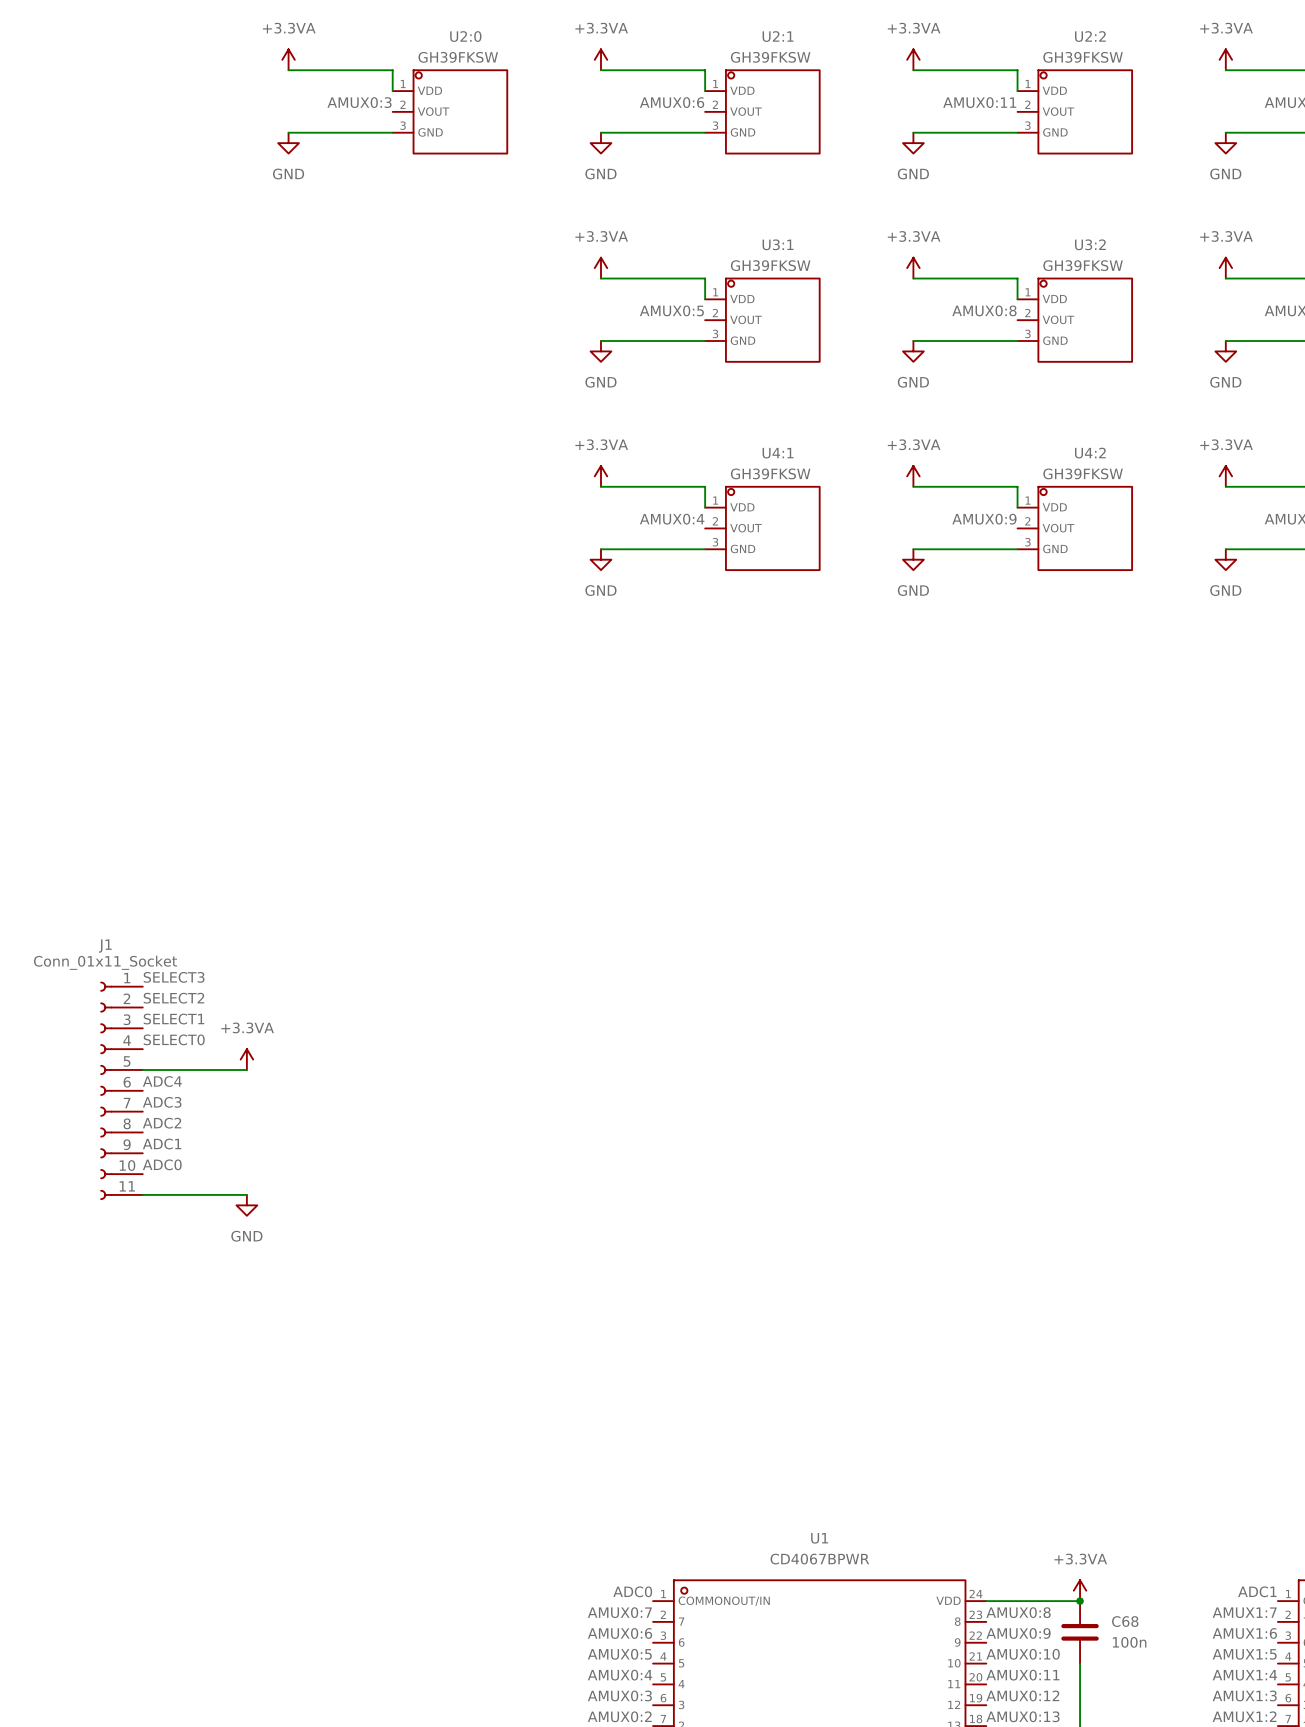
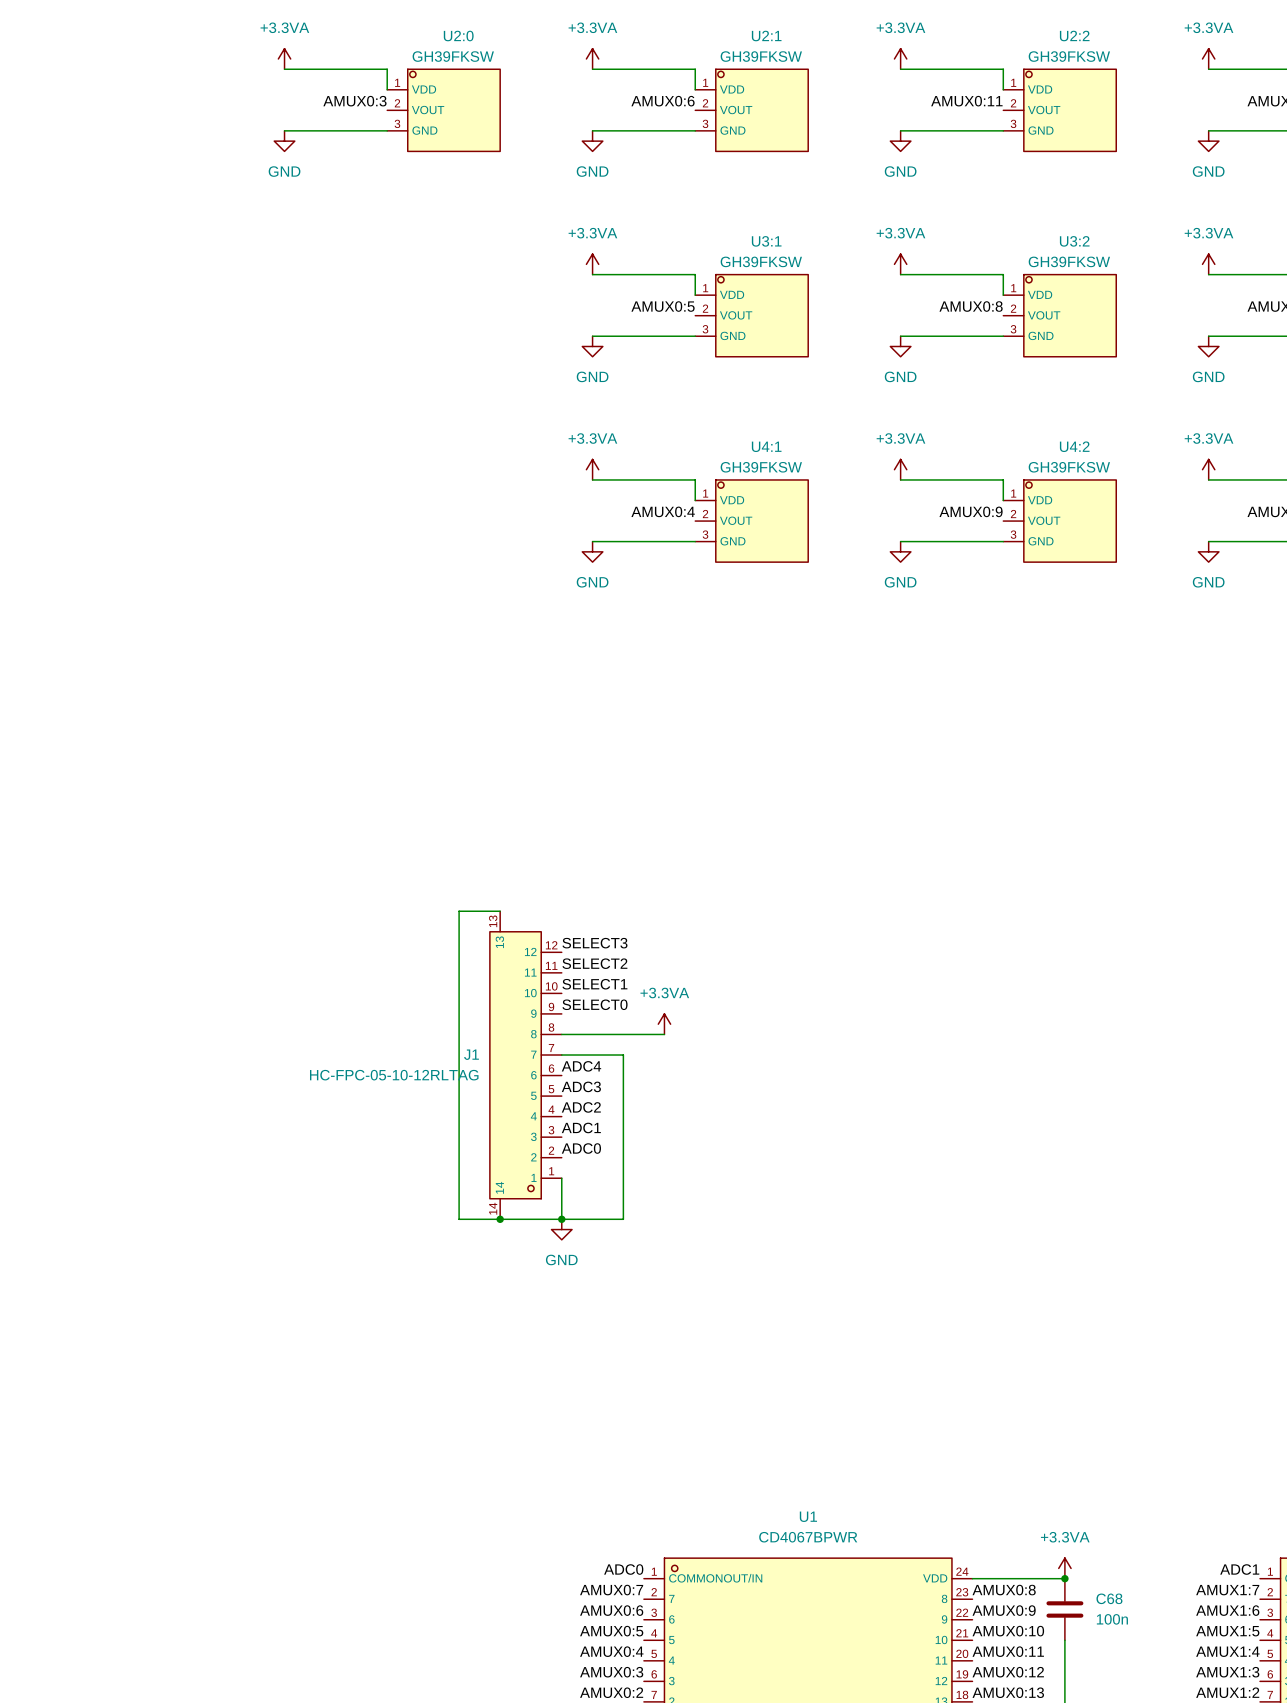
wire: none -> (500, 911) (459, 911) (459, 1219) (623, 1219) (623, 1055) (561, 1055)
J1 name position: J1 (105, 946) -> J1 (471, 1054)
label: none -> SELECT3 (594, 943)
J1 value: Conn_01x11_Socket (105, 962) -> HC-FPC-05-10-12RLTAG (394, 1075)
label: SELECT3 (174, 977) -> none
label: none -> SELECT2 (594, 963)
J1 symbol: [100, 981, 143, 1200] -> [489, 911, 562, 1220]
label: SELECT2 (173, 998) -> none
label: none -> SELECT1 (594, 984)
label: SELECT1 (174, 1019) -> none
label: none -> SELECT0 (595, 1004)
power symbol: none -> +3.3VA (664, 1024)
label: SELECT0 (174, 1039) -> none
wire: none -> (561, 1034) (664, 1034)
power symbol: +3.3VA (246, 1059) -> none
wire: (142, 1069) (246, 1069) -> none
label: ADC4 (162, 1081) -> none
label: none -> ADC4 (581, 1066)
label: ADC3 (162, 1102) -> none
label: none -> ADC3 (581, 1086)
label: ADC2 (162, 1123) -> none
label: none -> ADC2 (581, 1107)
label: ADC1 (162, 1144) -> none
label: none -> ADC1 (581, 1127)
label: ADC0 (162, 1164) -> none
label: none -> ADC0 (581, 1148)
wire: (142, 1194) (246, 1194) -> none
wire: none -> (561, 1178) (561, 1219)
power symbol: GND (246, 1205) -> none
junction: none -> (500, 1219)
junction: none -> (561, 1219)
power symbol: none -> GND (561, 1229)

